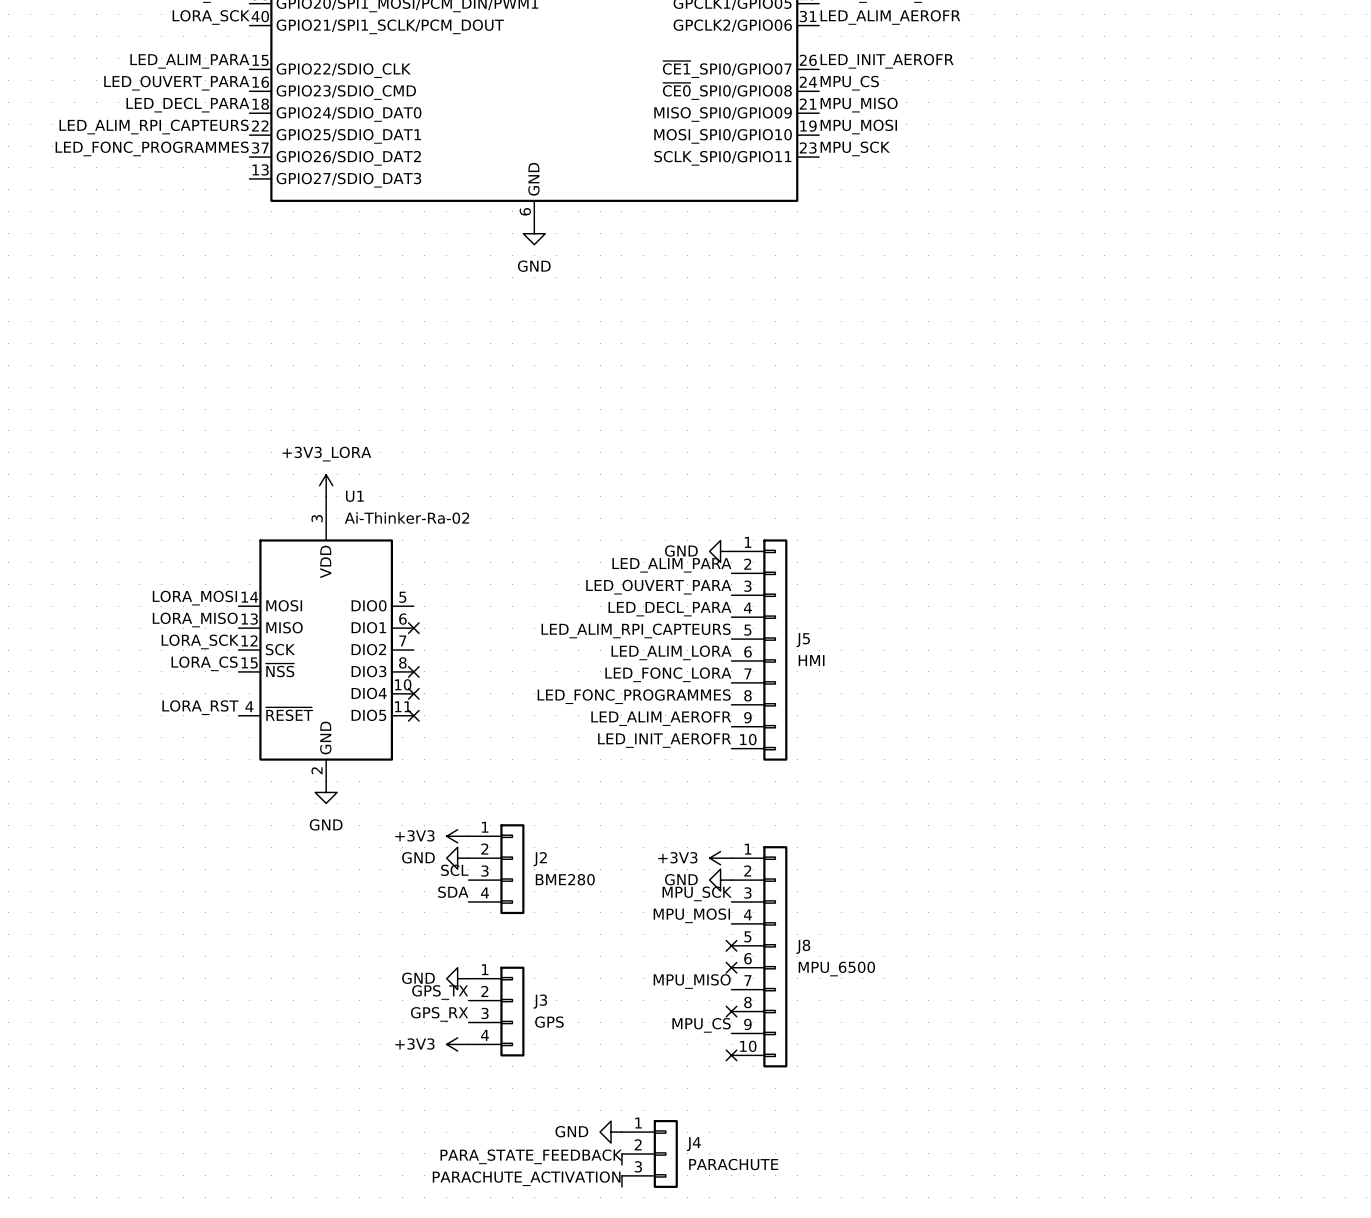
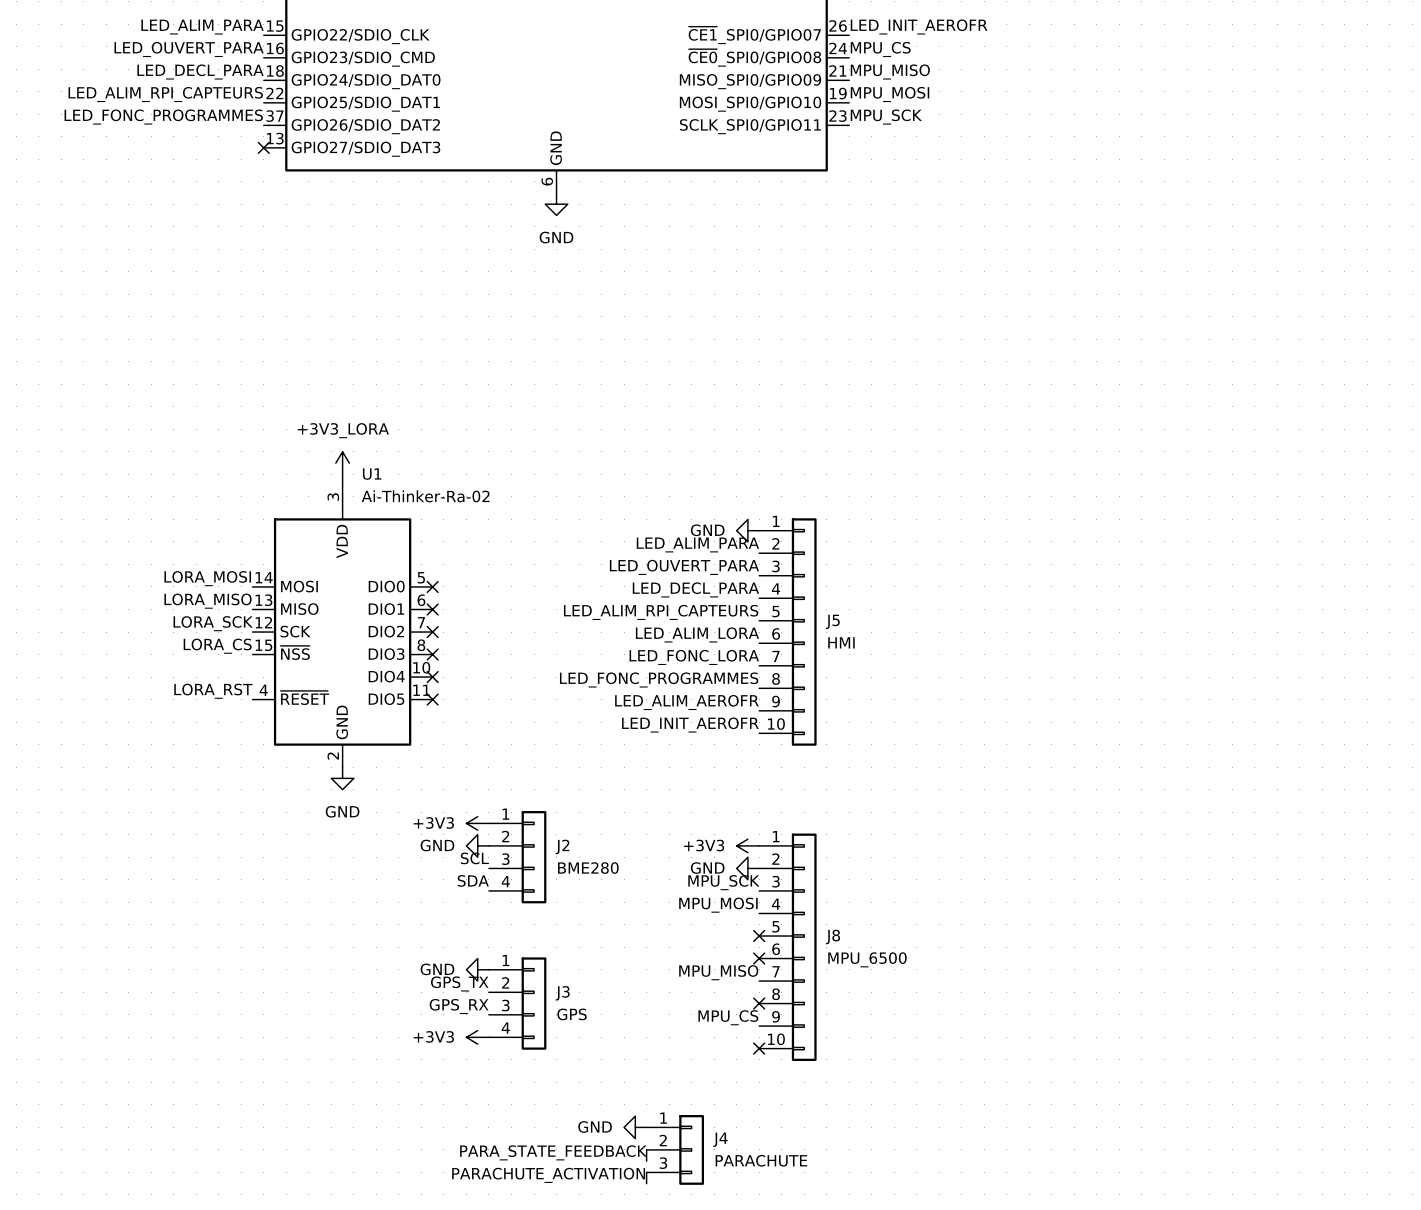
no-connect mark: none -> (263, 147)
no-connect mark: none -> (432, 586)
no-connect mark: none -> (432, 632)

